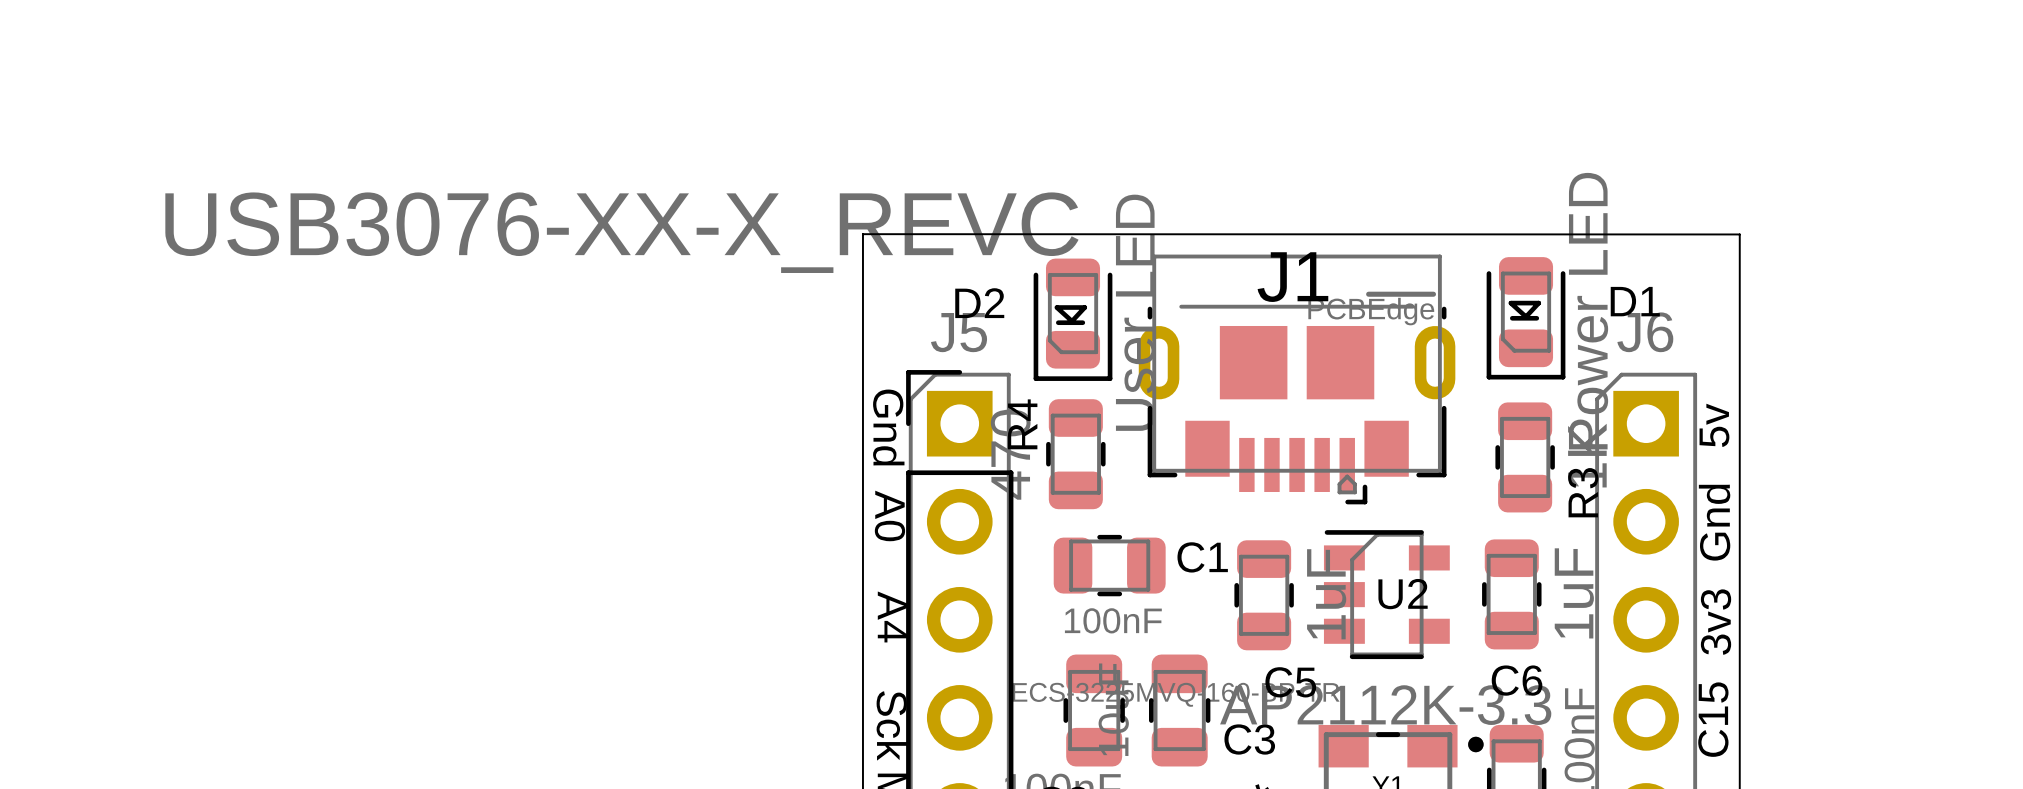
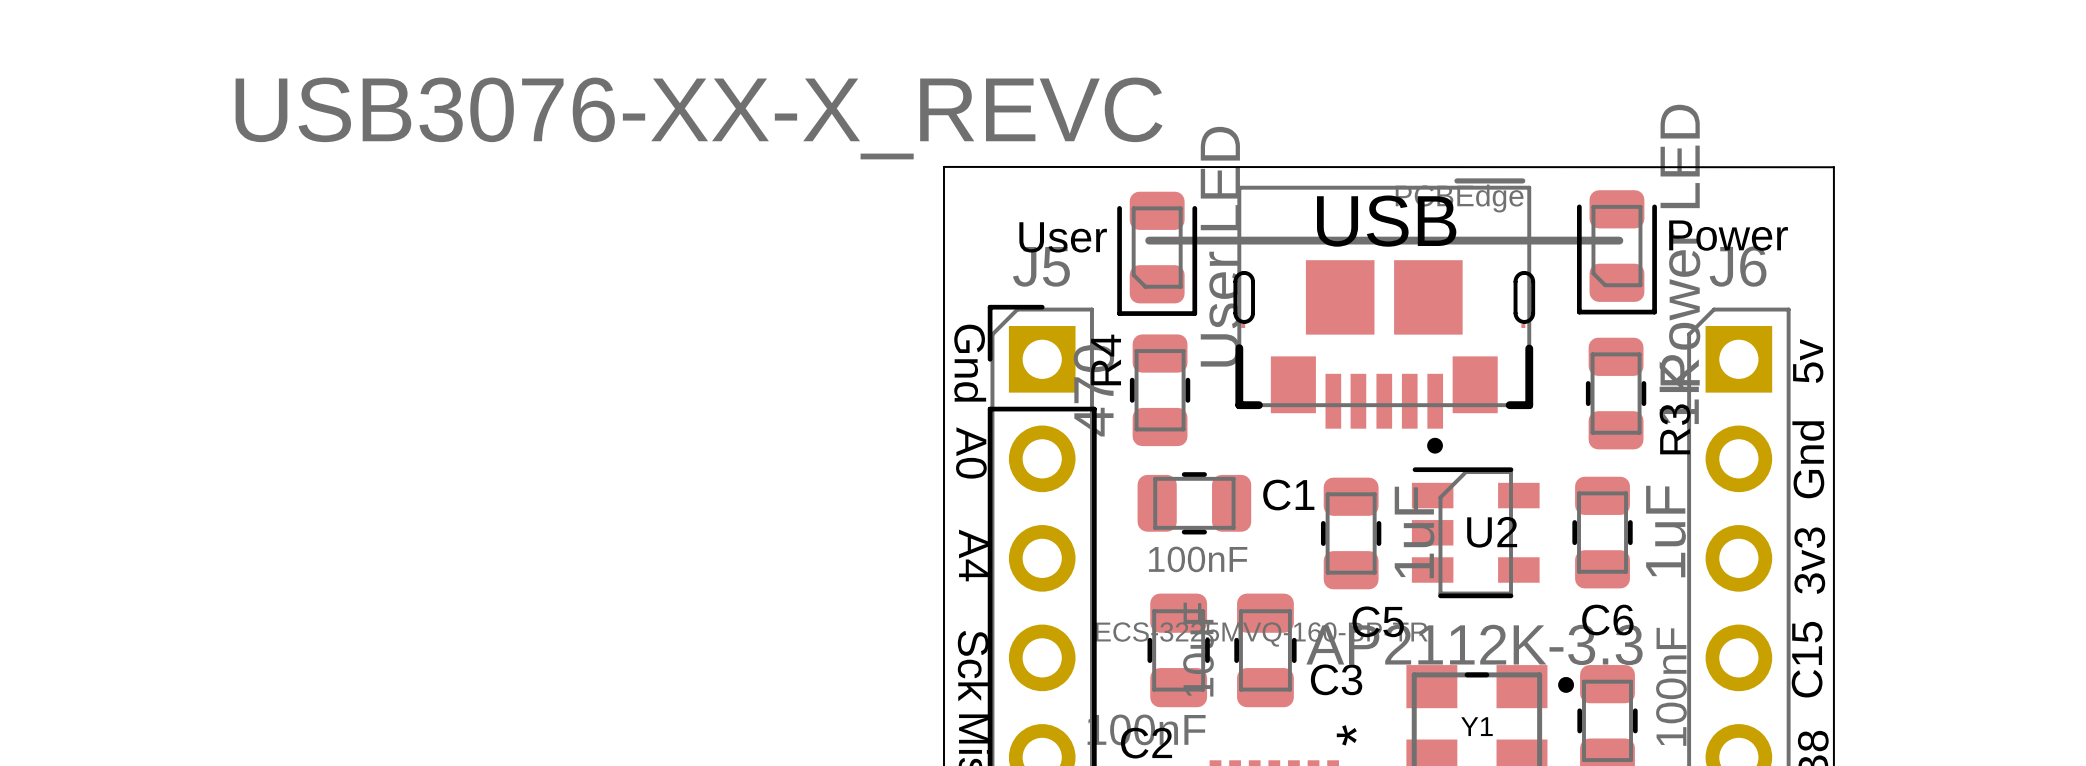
D1 name: D1 (1635, 301) -> Power (1728, 235)
D2 name: D2 (979, 303) -> User (1063, 237)
line: (1510, 303) (1526, 316) (1538, 303) (1511, 303) -> none
line: (1056, 307) (1072, 321) (1084, 307) (1057, 307) -> none
line: (1512, 318) (1536, 318) -> none
line: (1058, 322) (1082, 322) -> none
J1: USB3076-XX-X_REVC (1297, 379) -> none
USB: none -> USB3076-XX-X_REVC (1384, 319)

